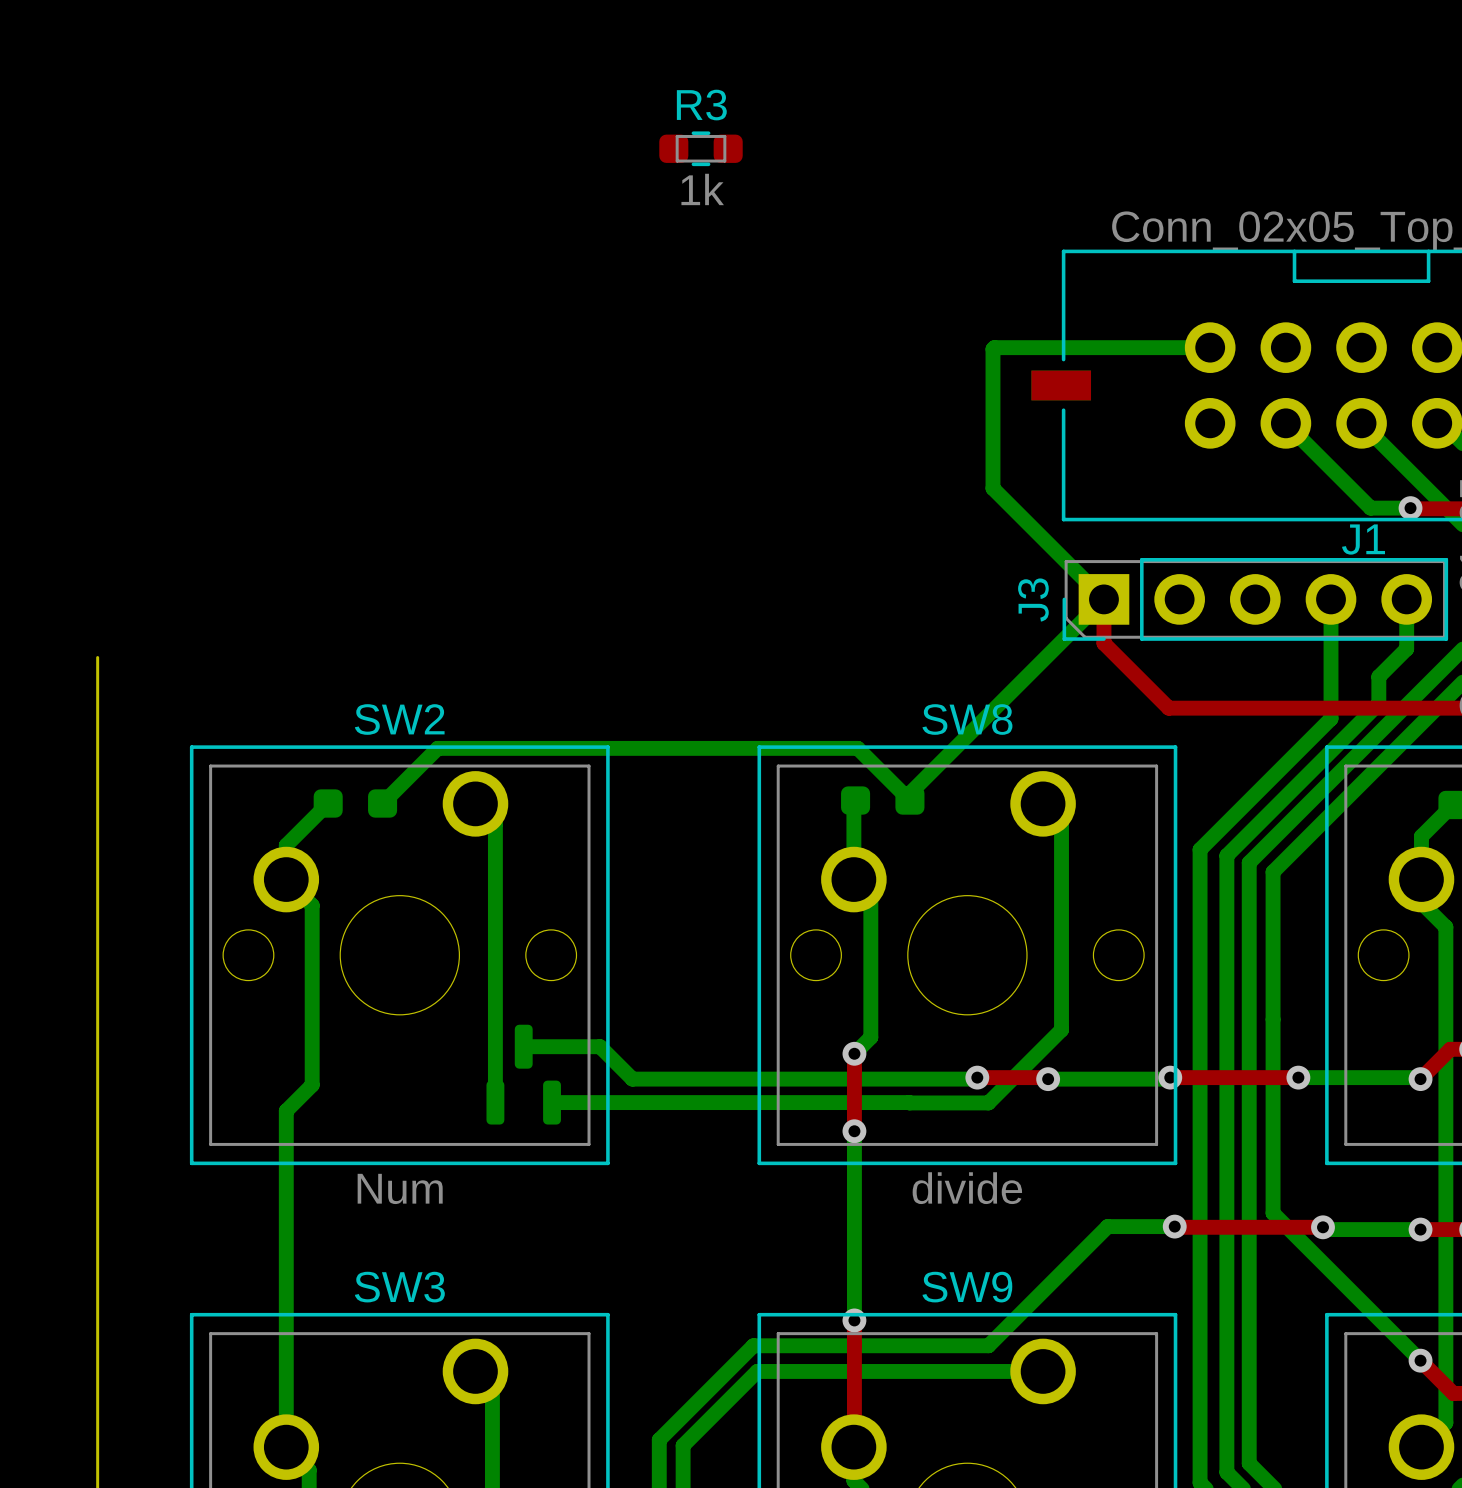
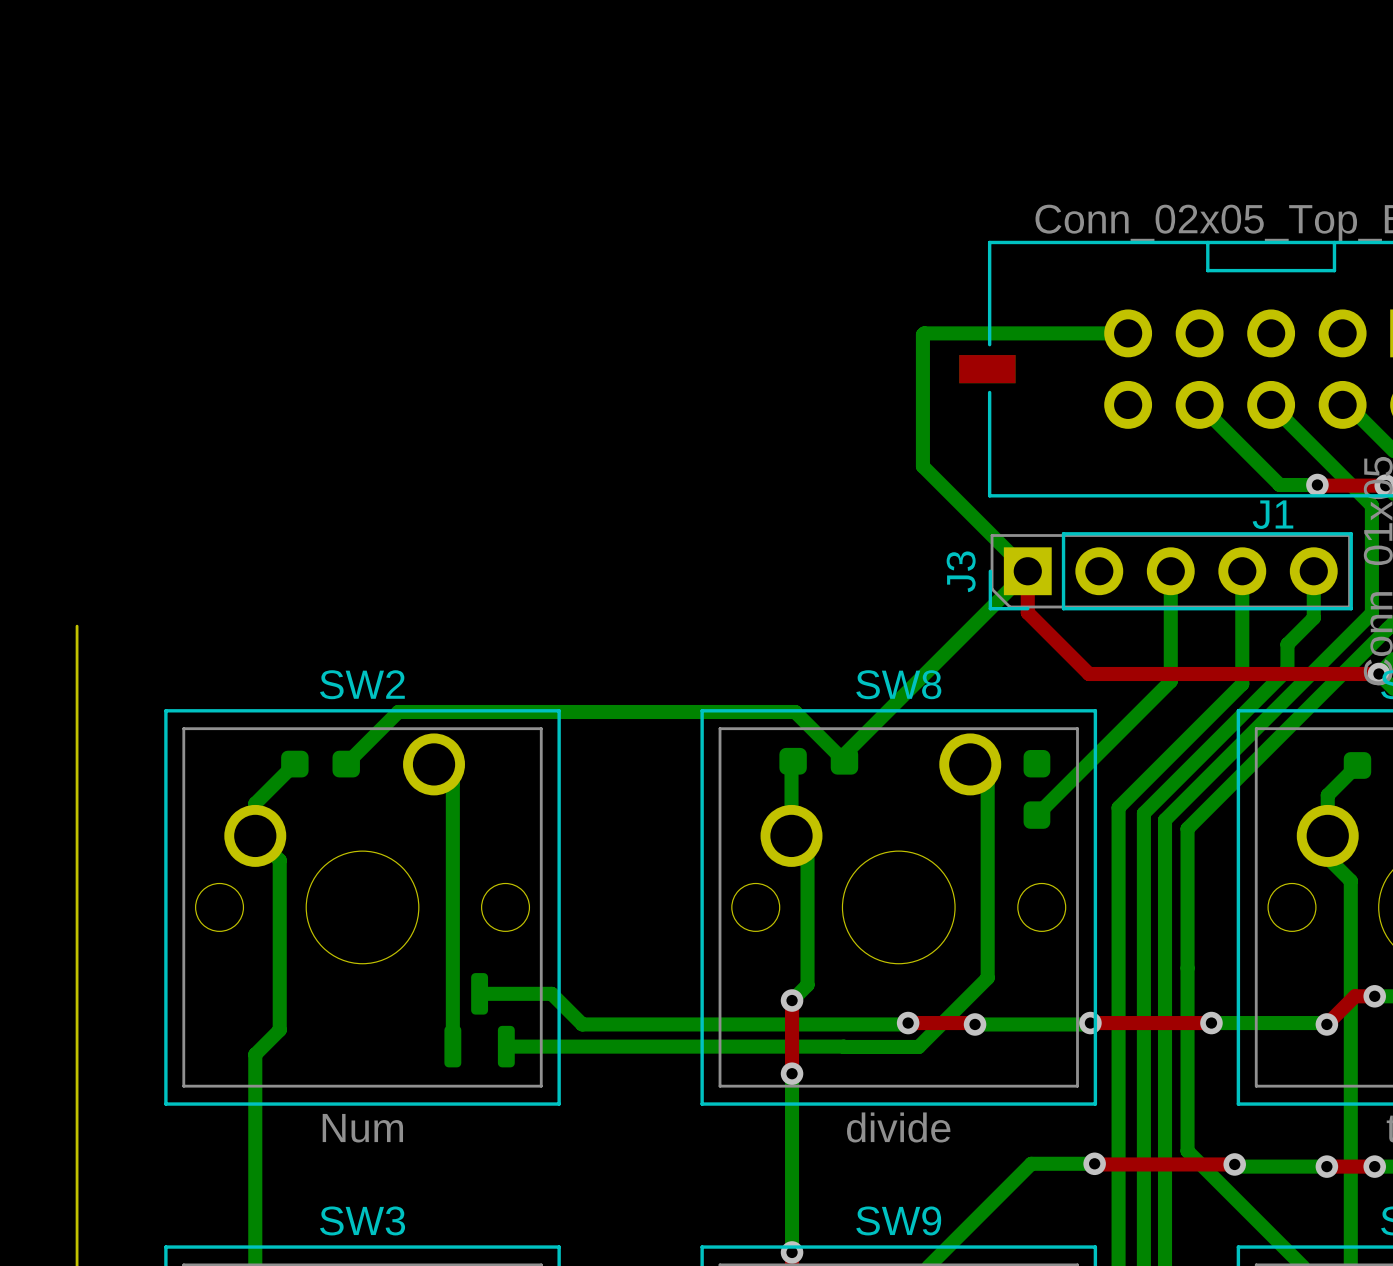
R3: 1k (701, 148) -> none
bottom track: none -> (1170, 571) (1170, 681) (1036, 815)
part: none -> (1036, 789)

